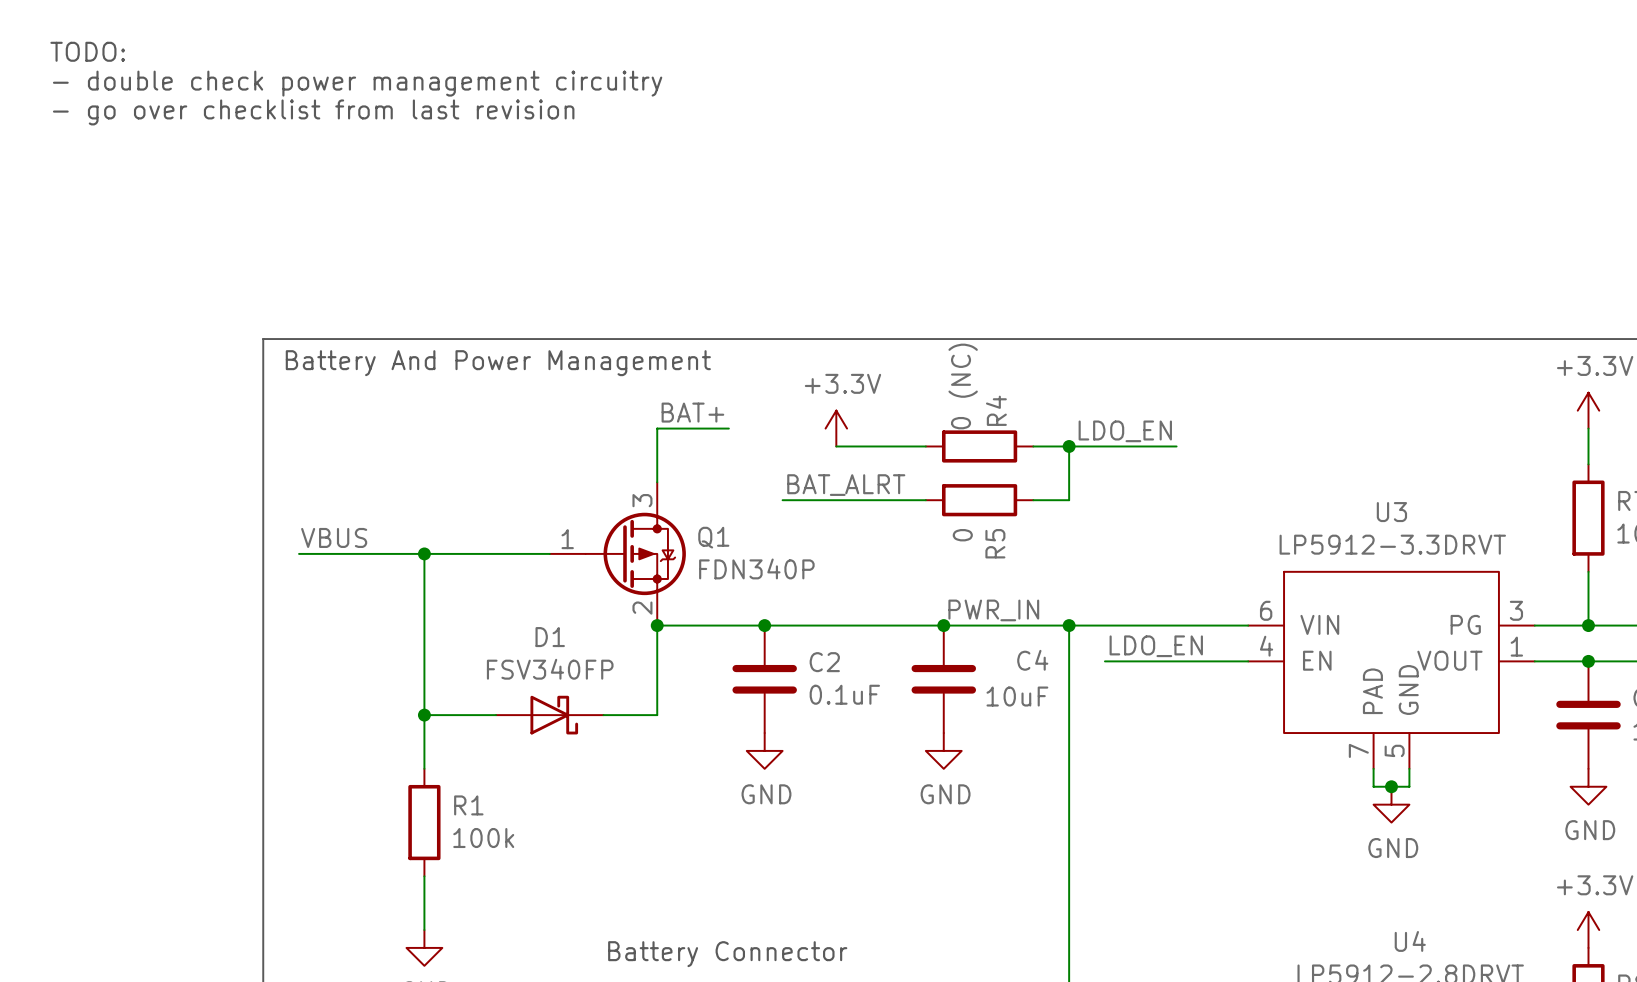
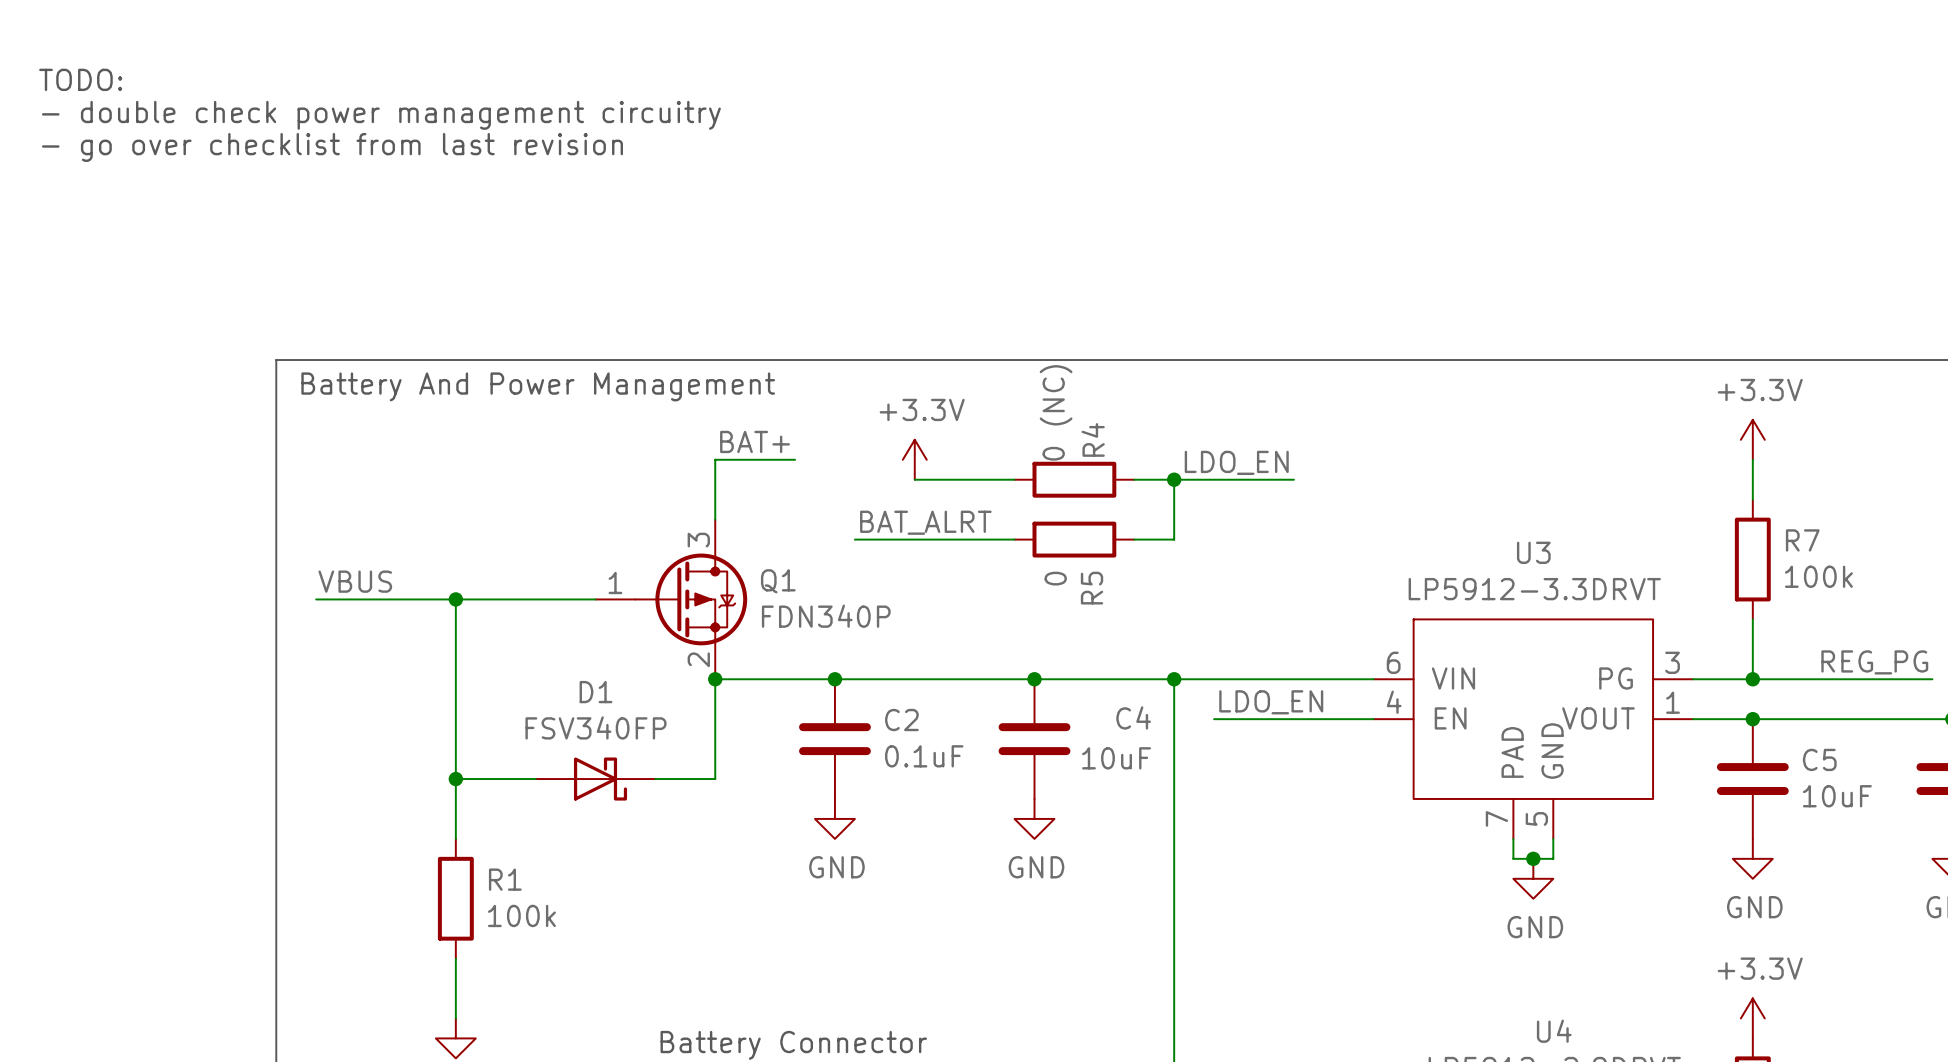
text position: TODO: (87, 51) -> TODO: (80, 79)
text position: - double check power management circuitry (357, 83) -> - double check power management circuitry (381, 115)
text position: - go over checklist from last revision (313, 112) -> - go over checklist from last revision (332, 147)
label: PWR_IN (993, 610) -> none

